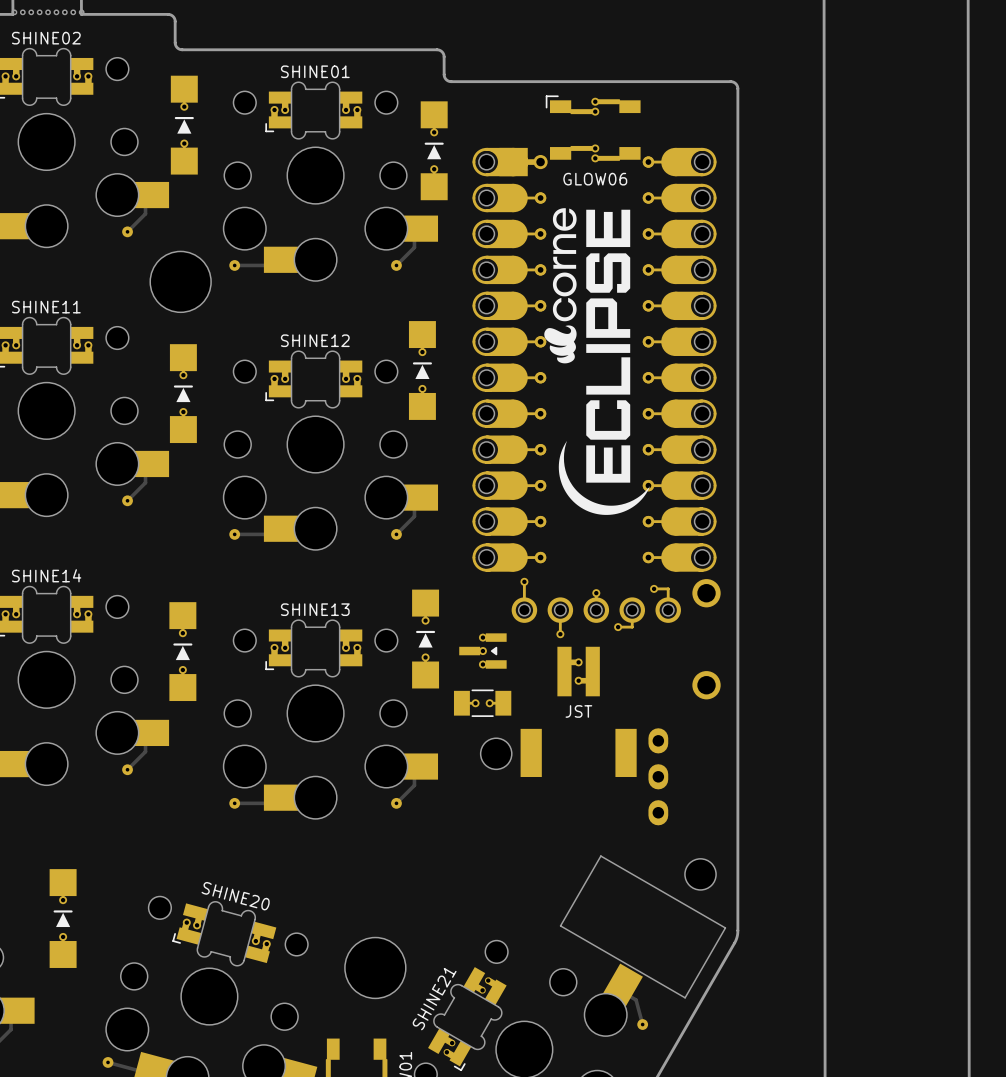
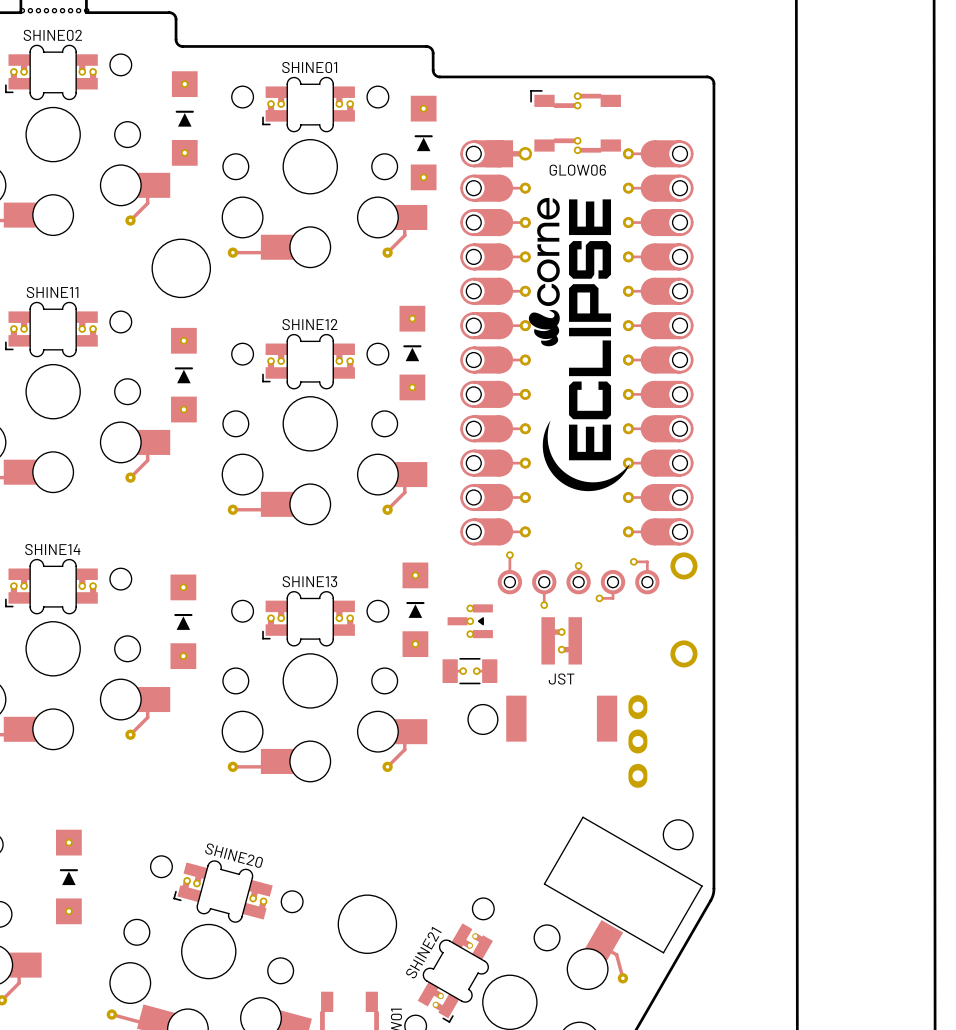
part footprint: [170, 75, 198, 175] -> [171, 71, 198, 166]
part footprint: [420, 101, 448, 201] -> [410, 95, 437, 191]
part footprint: [408, 321, 436, 420] -> [399, 305, 426, 401]
part footprint: [169, 344, 197, 444] -> [171, 327, 197, 423]
part footprint: [412, 589, 440, 689] -> [402, 562, 429, 658]
part footprint: [169, 602, 197, 702] -> [170, 574, 197, 670]
part footprint: [49, 869, 77, 968] -> [56, 829, 82, 925]

